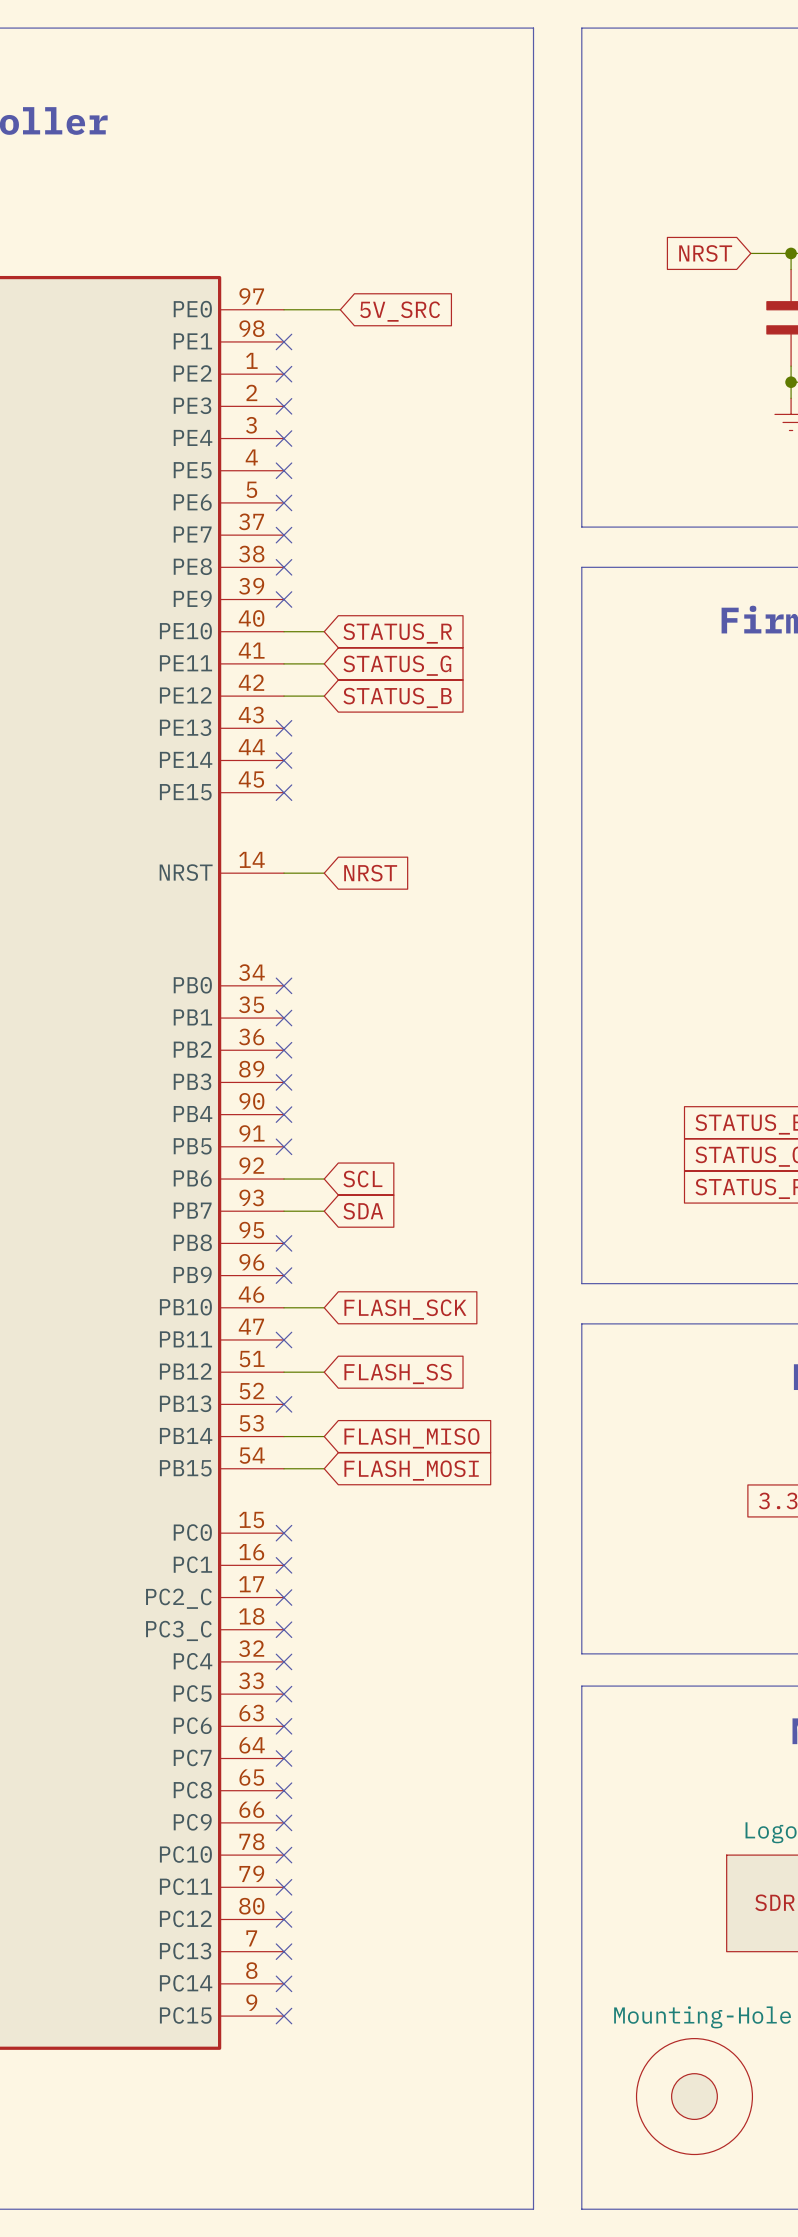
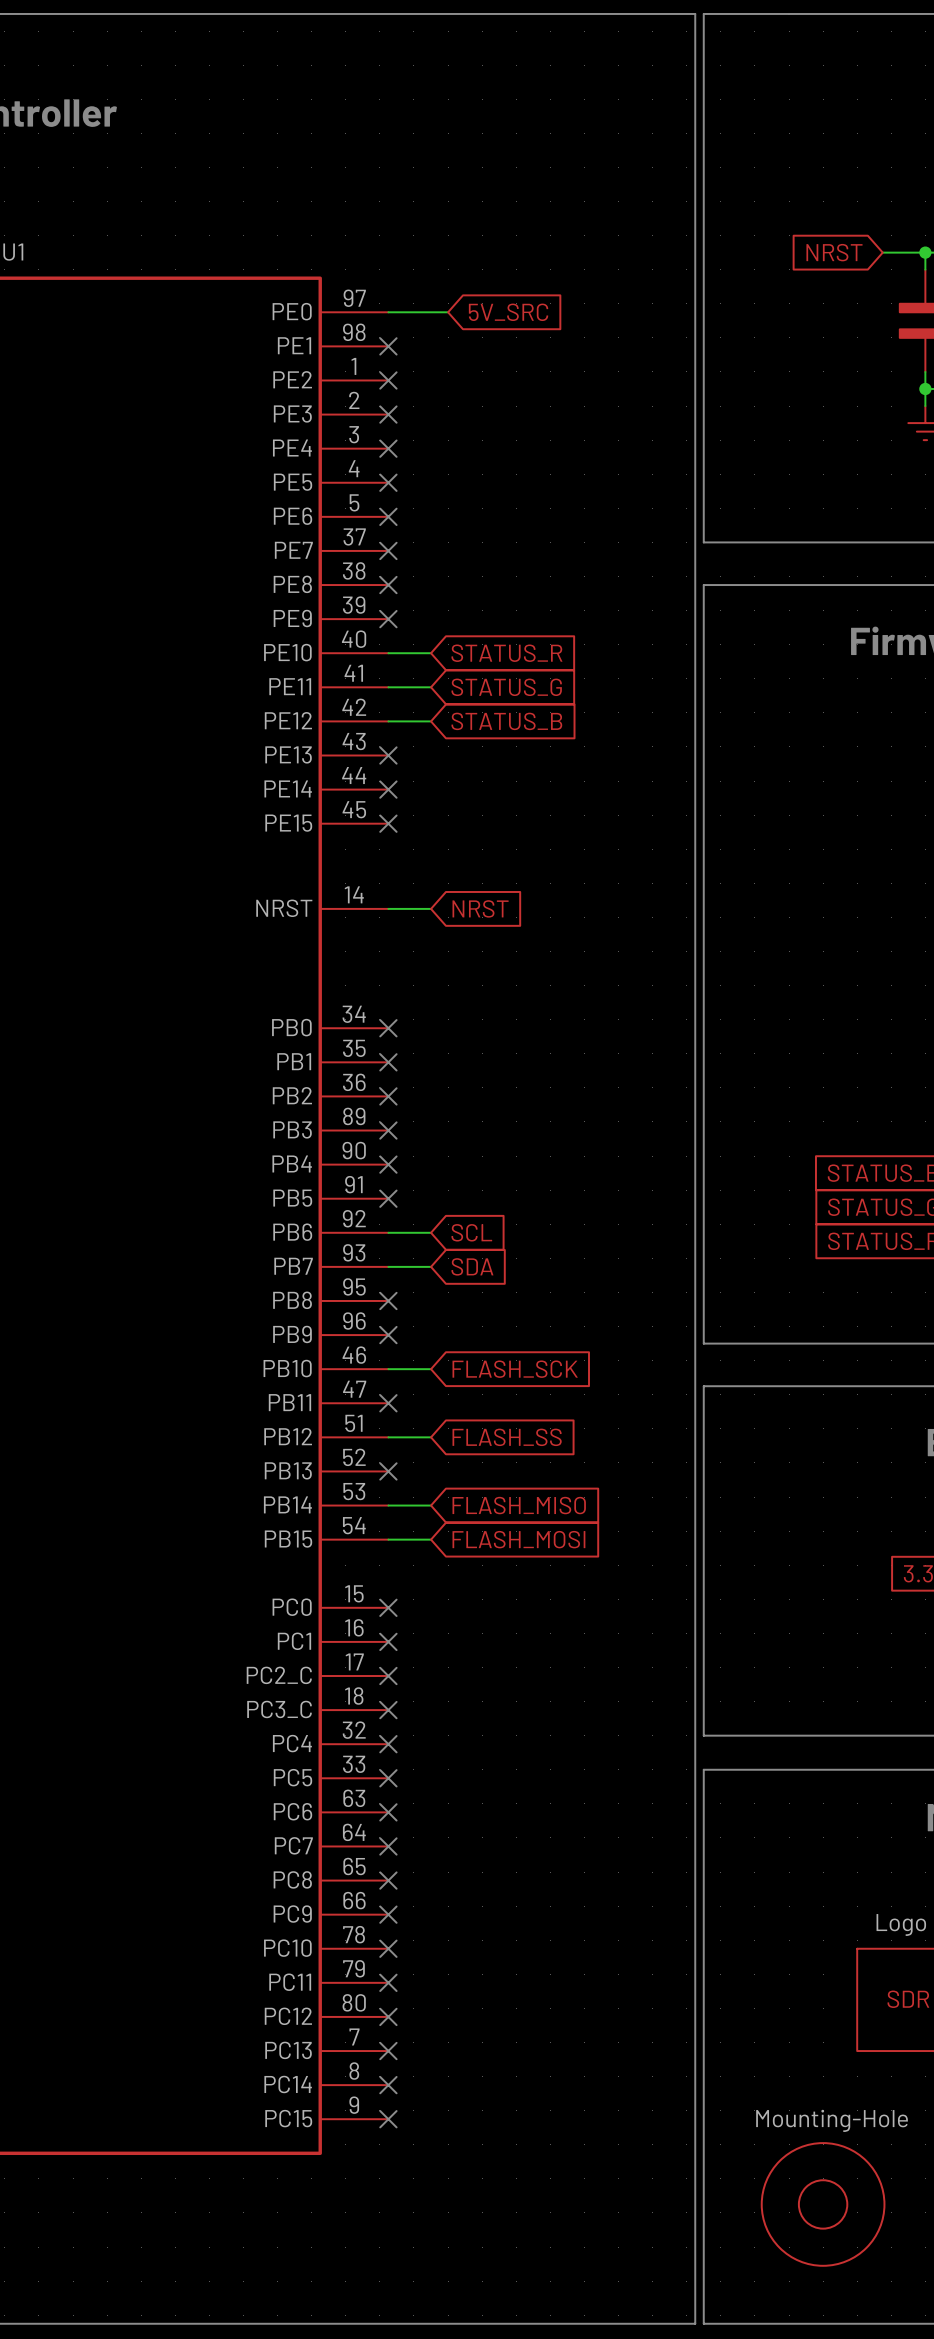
line: (533, 28) (533, 2209) -> (652, 13) (695, 13) (695, 2323) (652, 2323)

